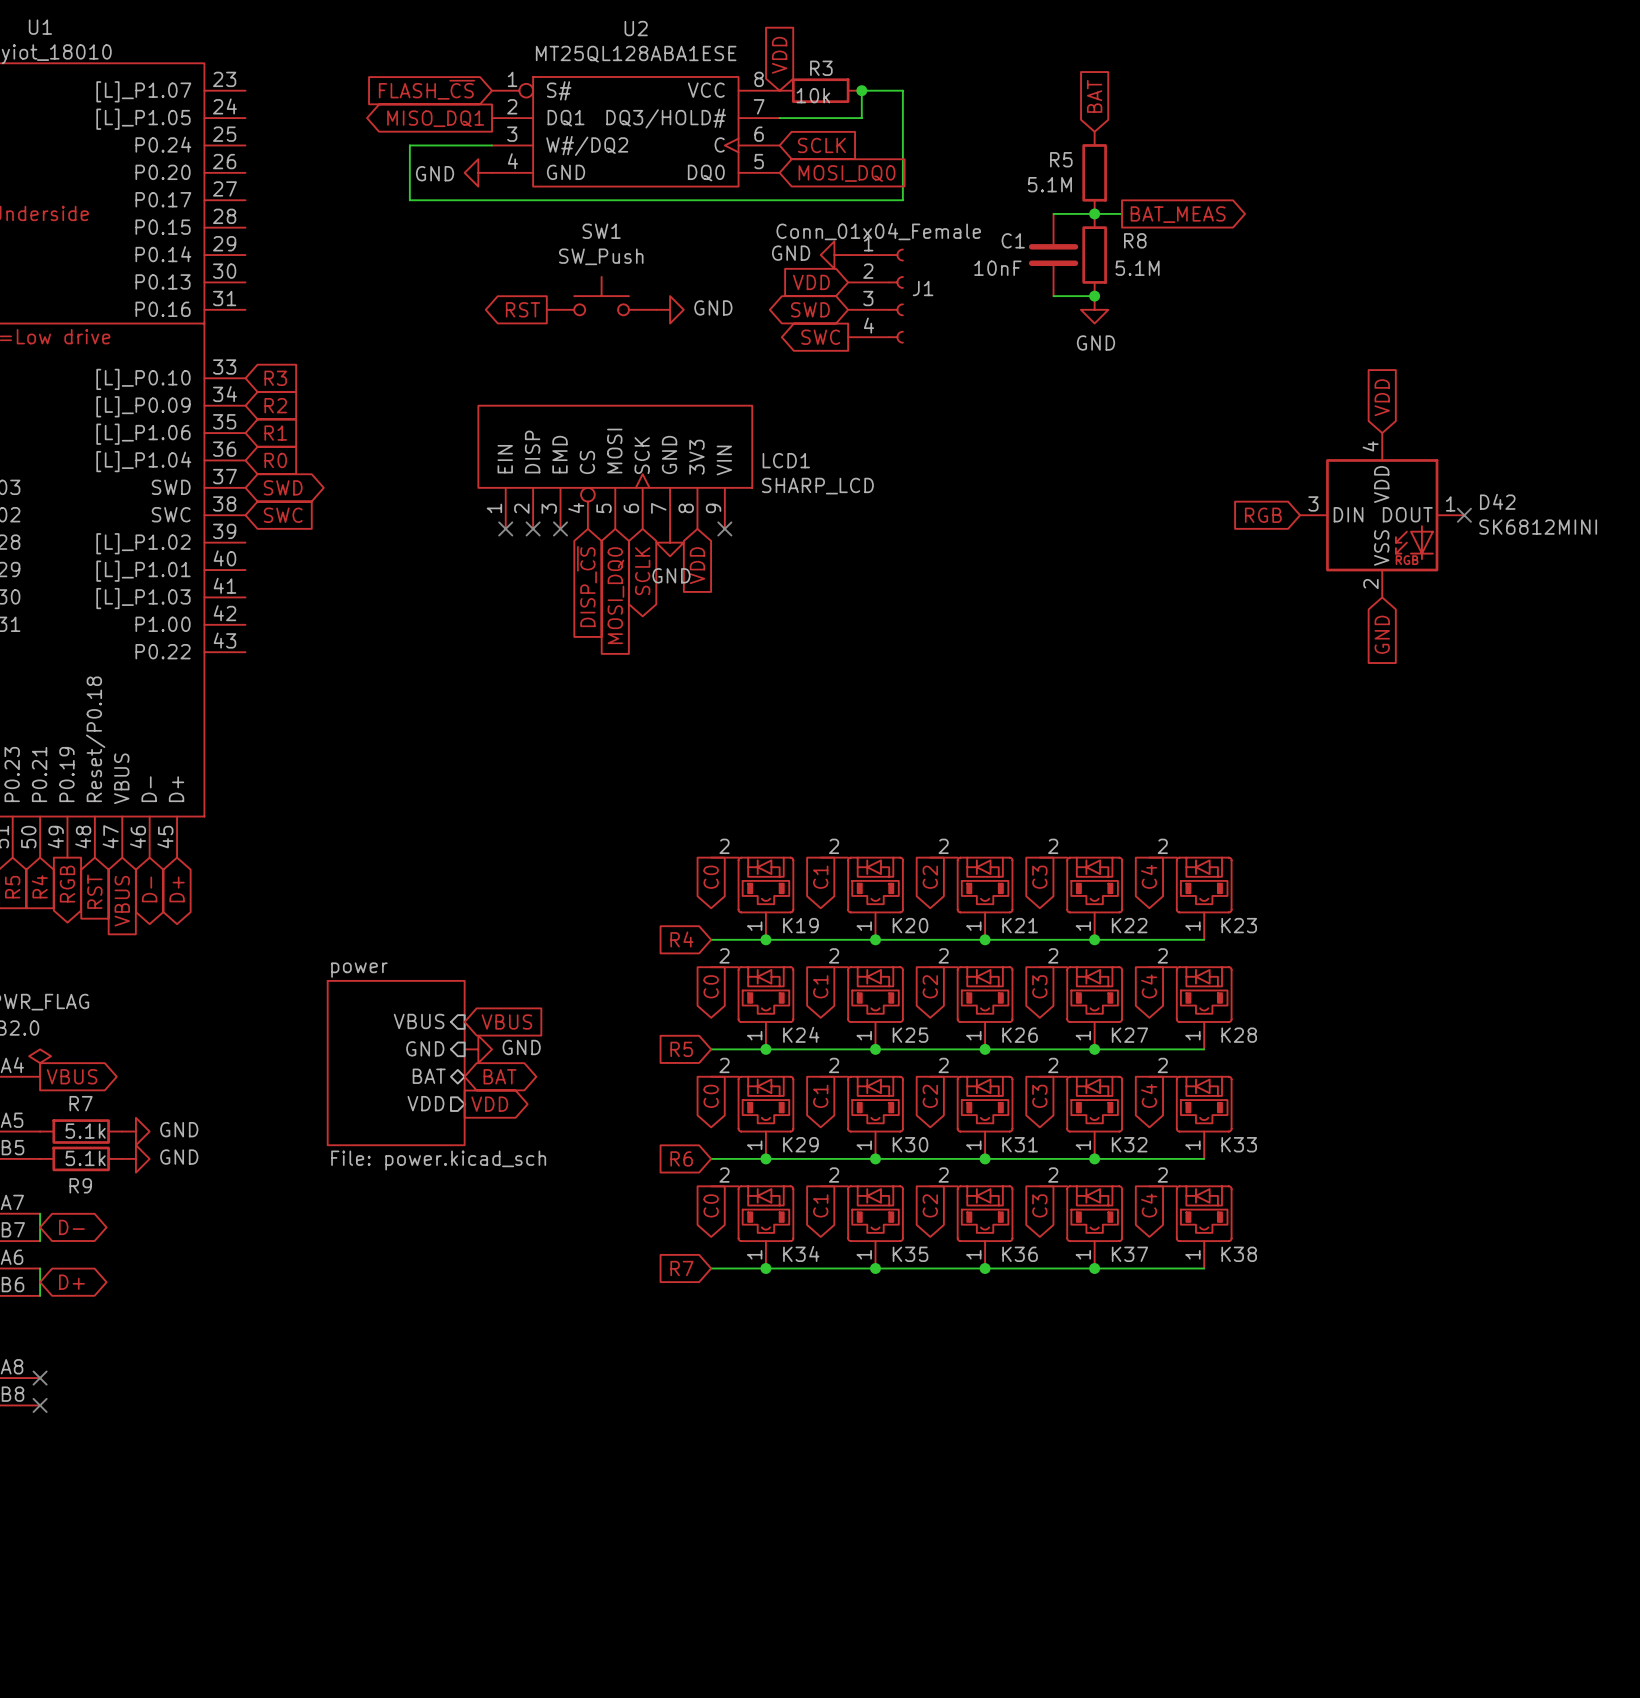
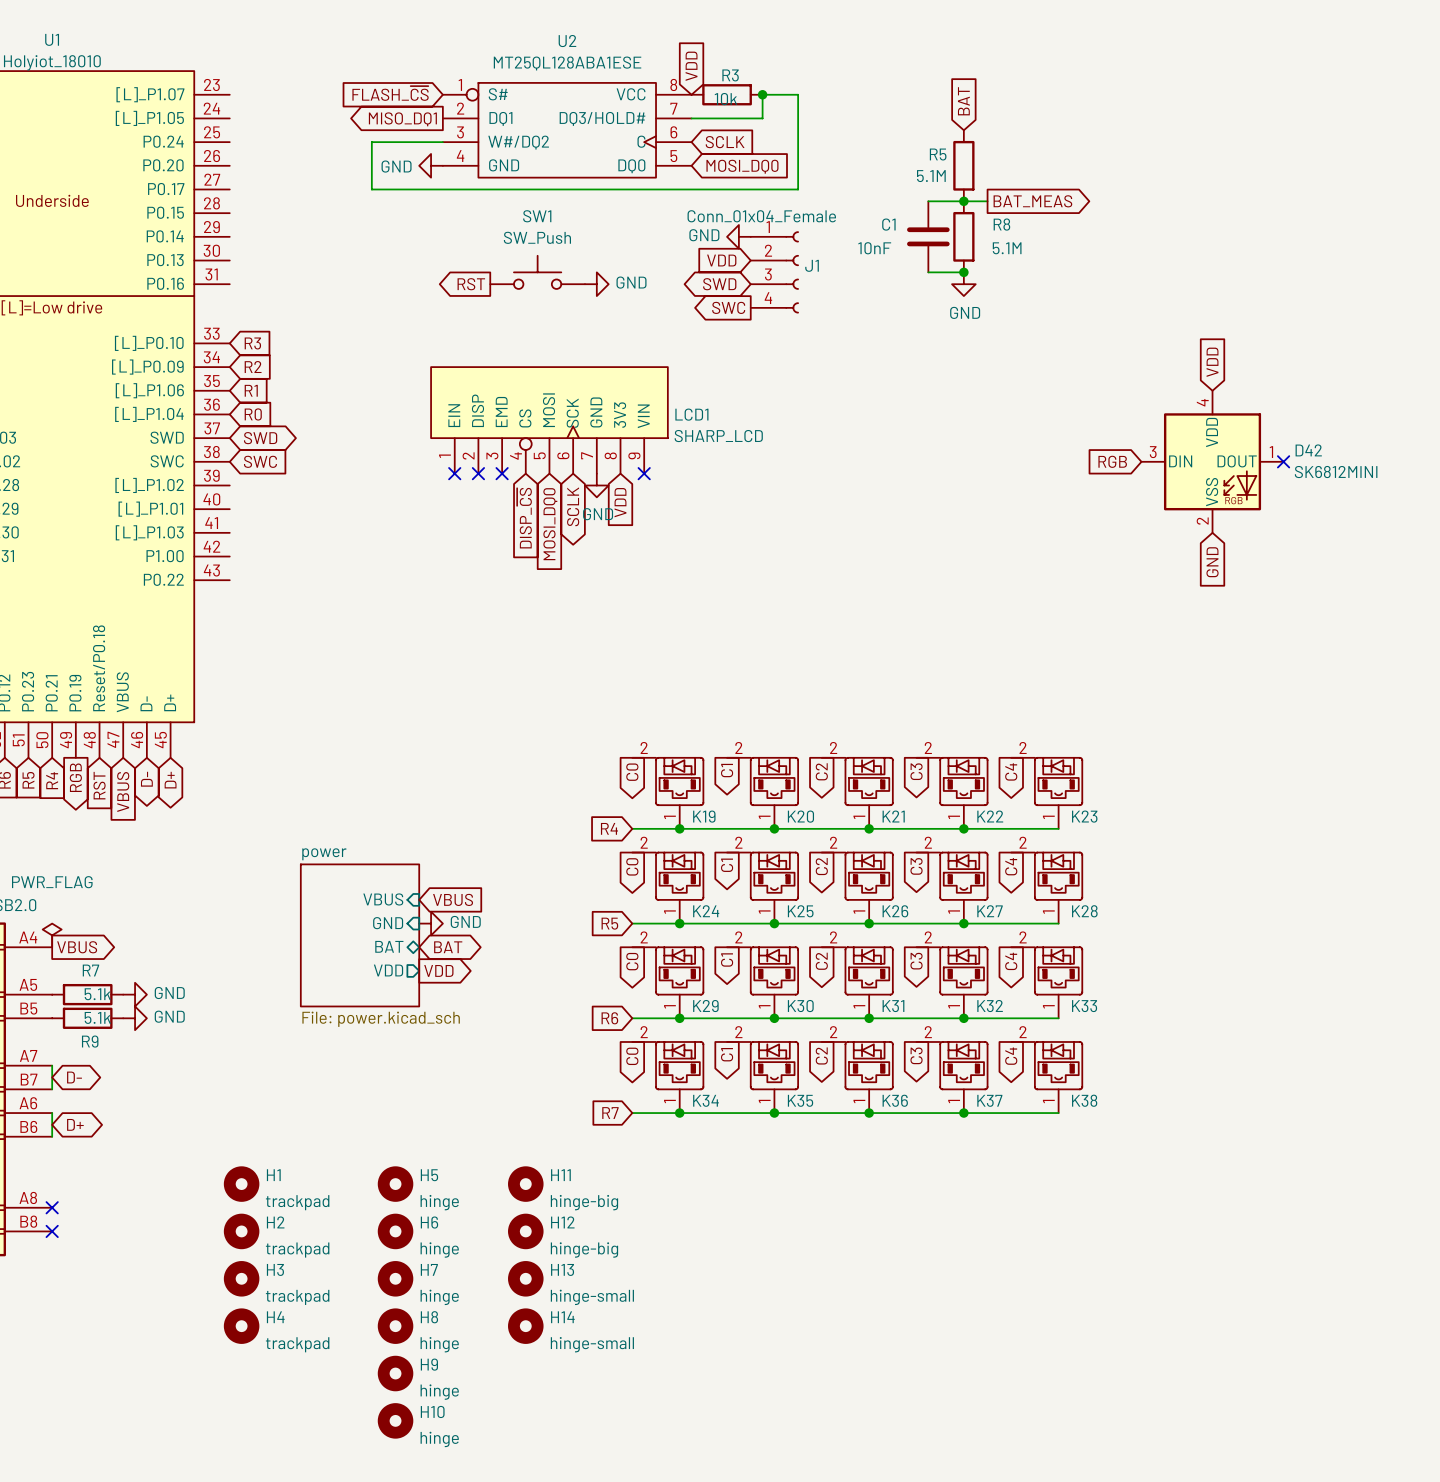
H1: none -> trackpad (241, 1184)
H5: none -> hinge (395, 1184)
H11: none -> hinge-big (525, 1184)
H2: none -> trackpad (241, 1231)
H6: none -> hinge (395, 1231)
H12: none -> hinge-big (525, 1231)
H3: none -> trackpad (241, 1278)
H7: none -> hinge (395, 1278)
H13: none -> hinge-small (525, 1278)
H4: none -> trackpad (241, 1326)
H8: none -> hinge (395, 1326)
H14: none -> hinge-small (525, 1326)
H9: none -> hinge (395, 1373)
H10: none -> hinge (395, 1420)

